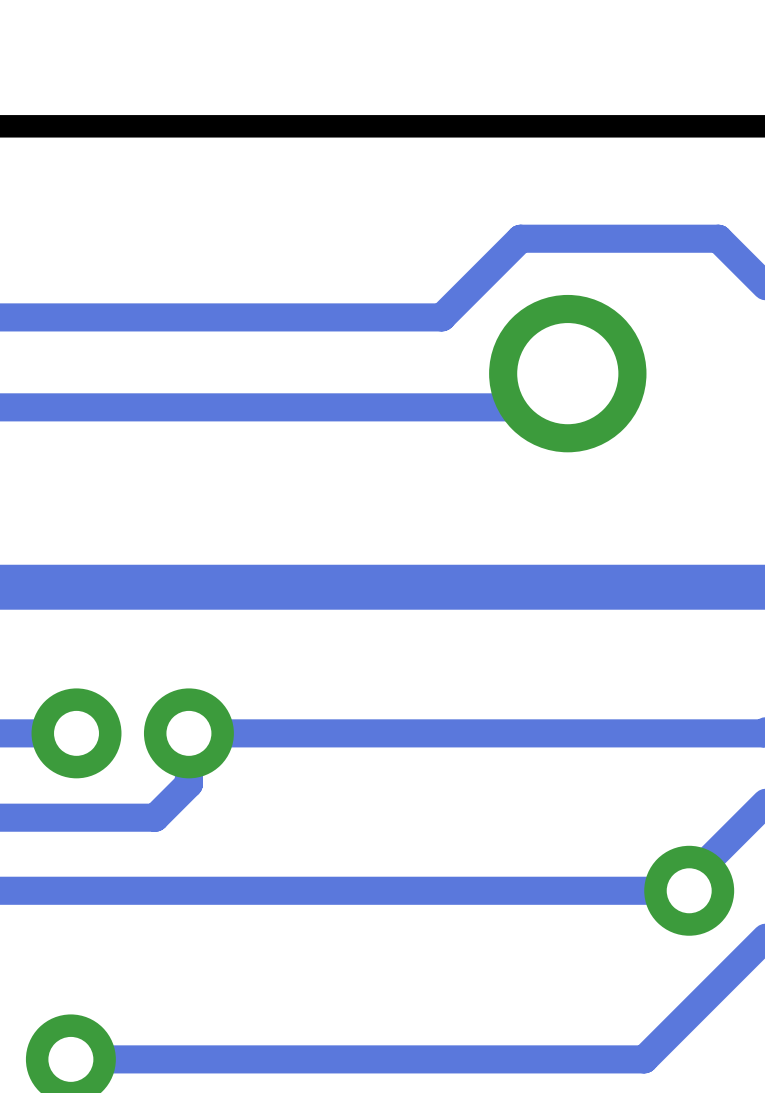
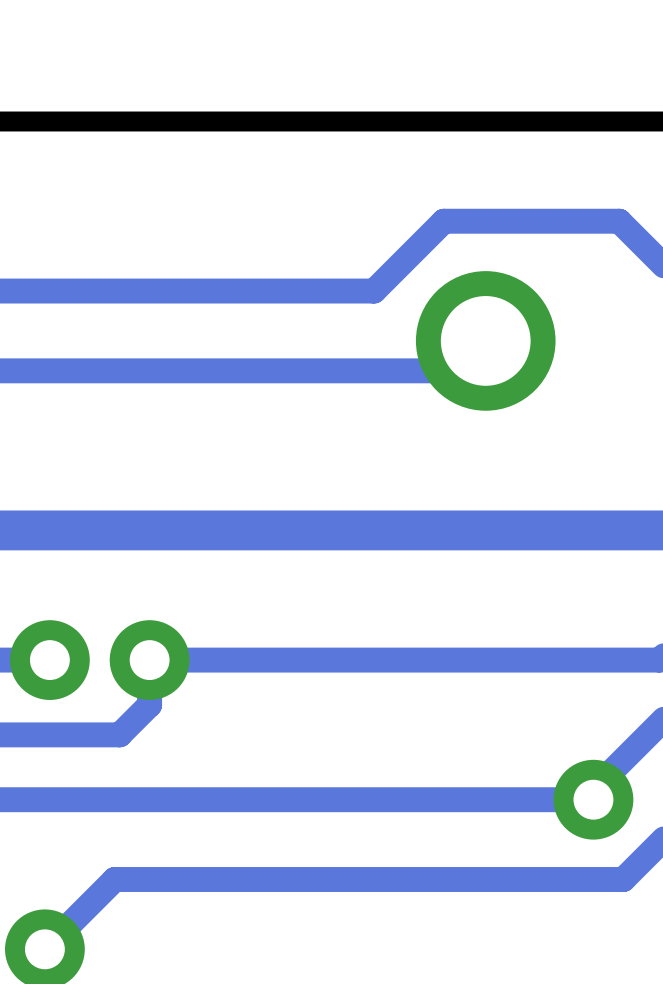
track: (722, 980) (644, 1059) (70, 1059) -> (623, 879) (114, 879) (44, 949)

